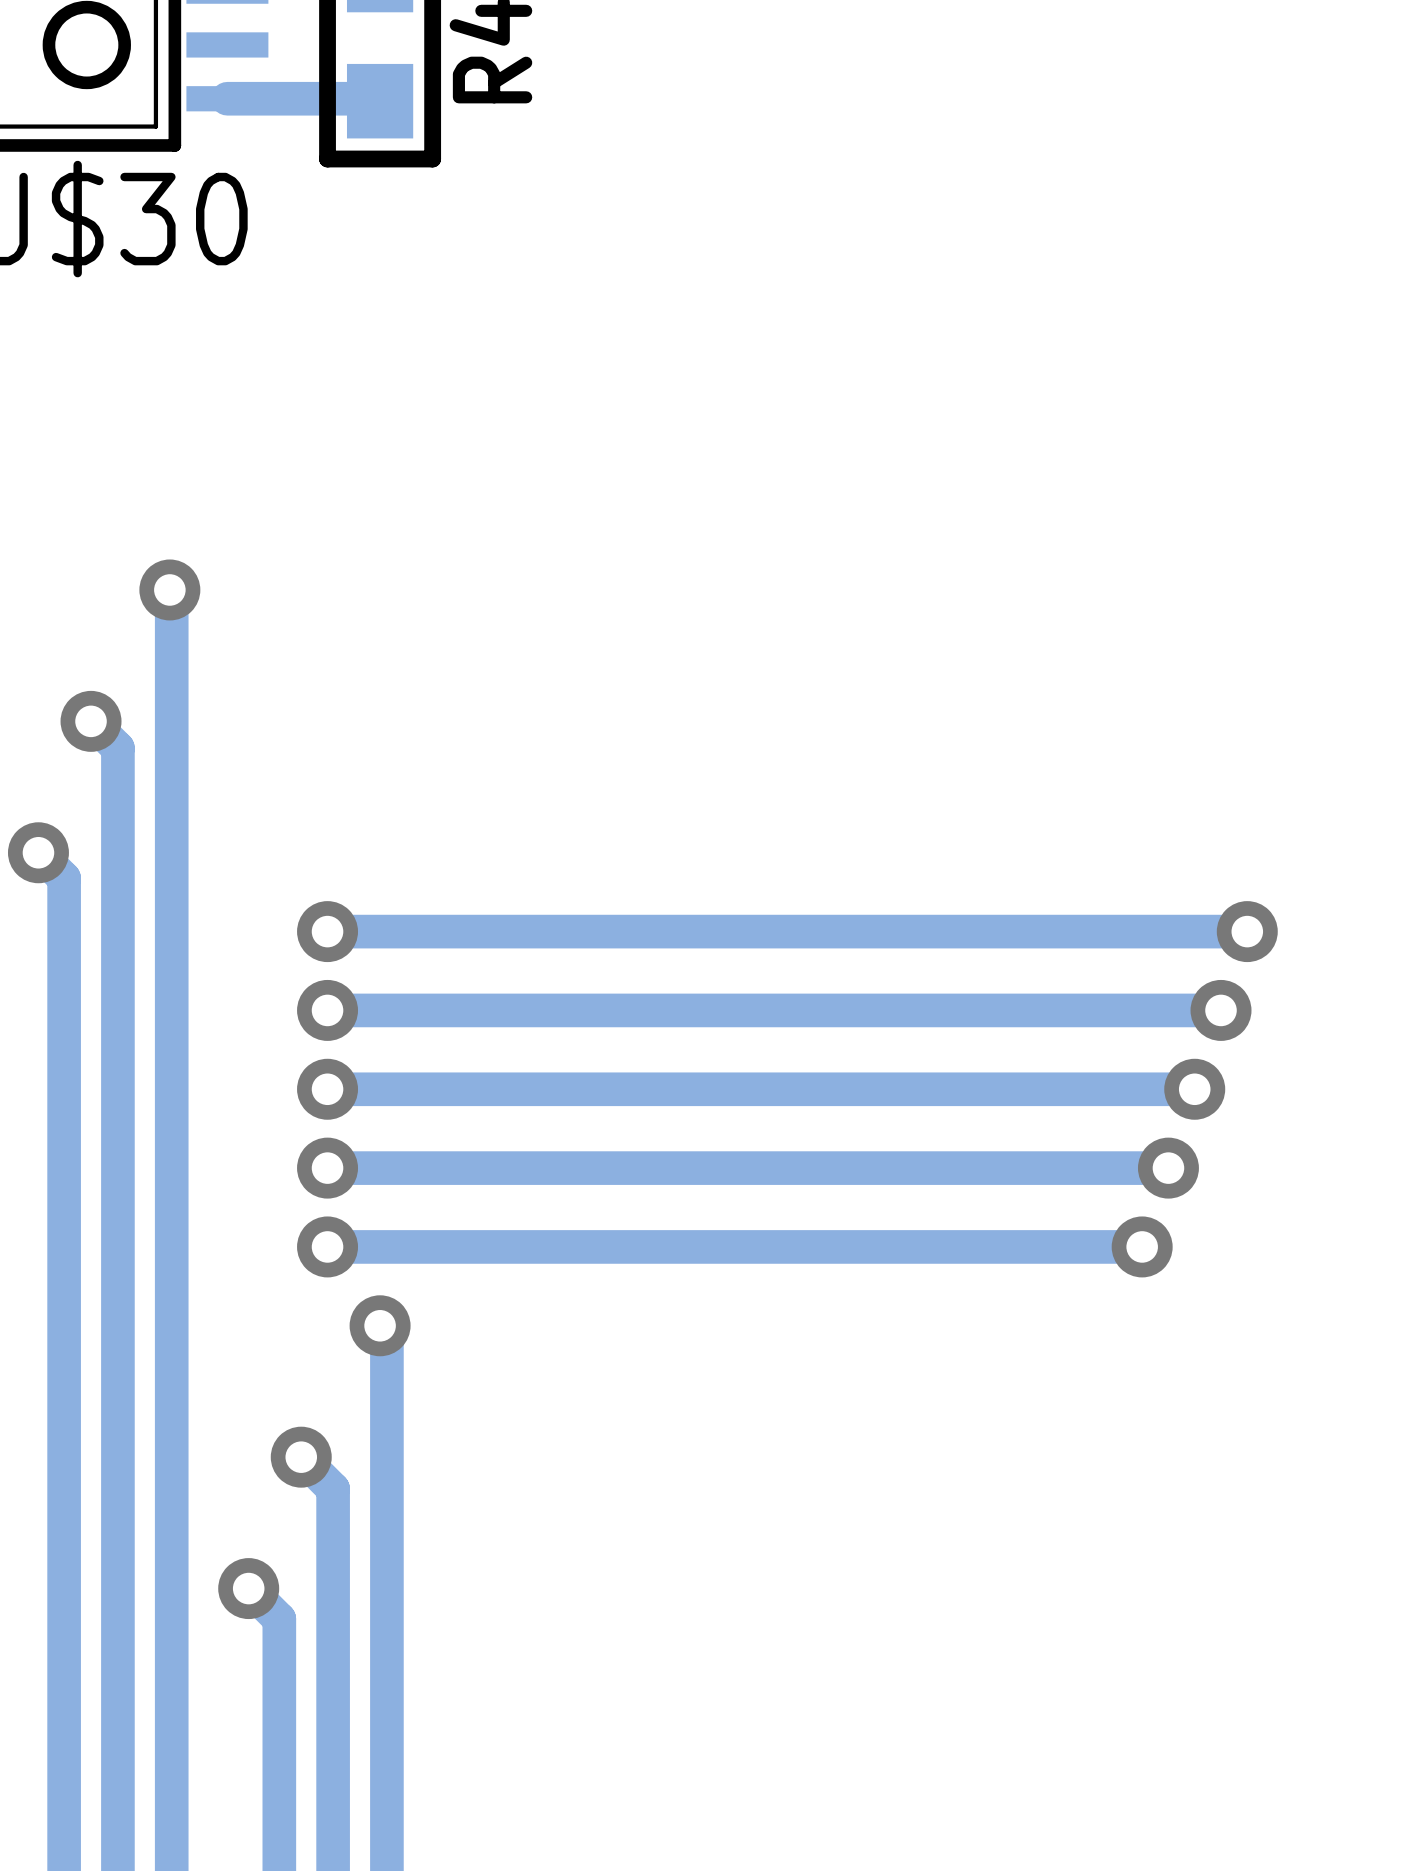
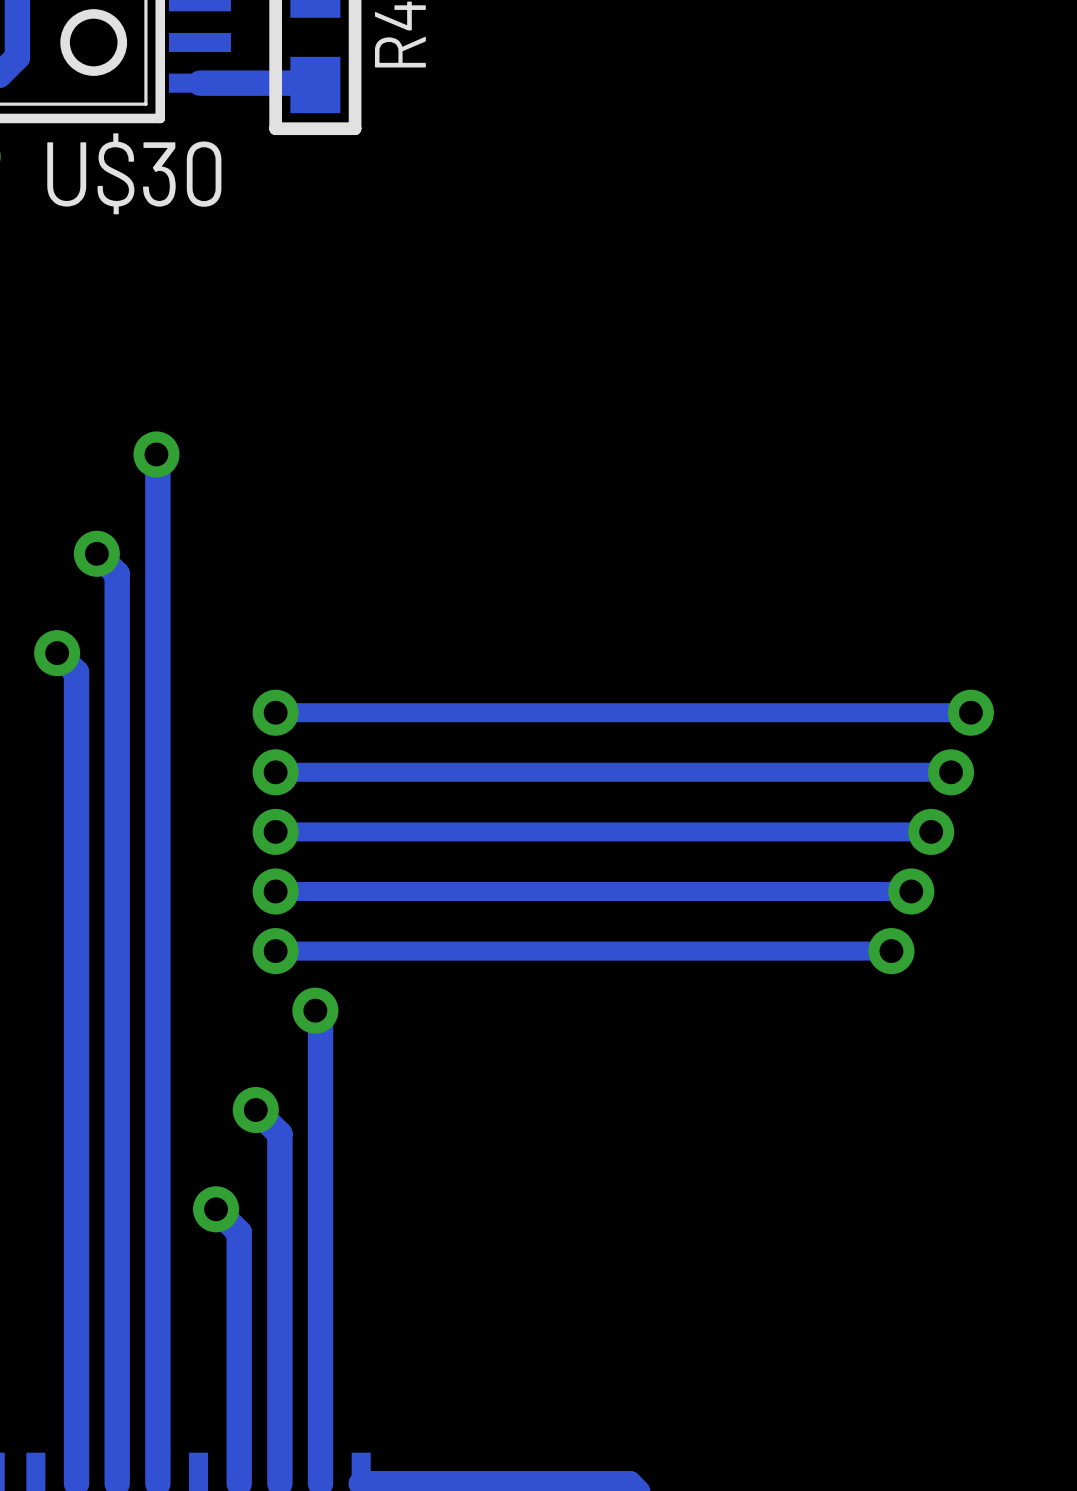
track width: thick (1247, 931) (327, 931) -> thin (970, 712) (275, 712)
track width: thick (1221, 1010) (327, 1010) -> thin (951, 772) (275, 772)
track width: thick (1194, 1089) (327, 1089) -> thin (931, 831) (275, 831)
track width: thick (1168, 1168) (327, 1168) -> thin (911, 891) (275, 891)
track width: thick (1142, 1246) (327, 1246) -> thin (891, 951) (275, 951)

